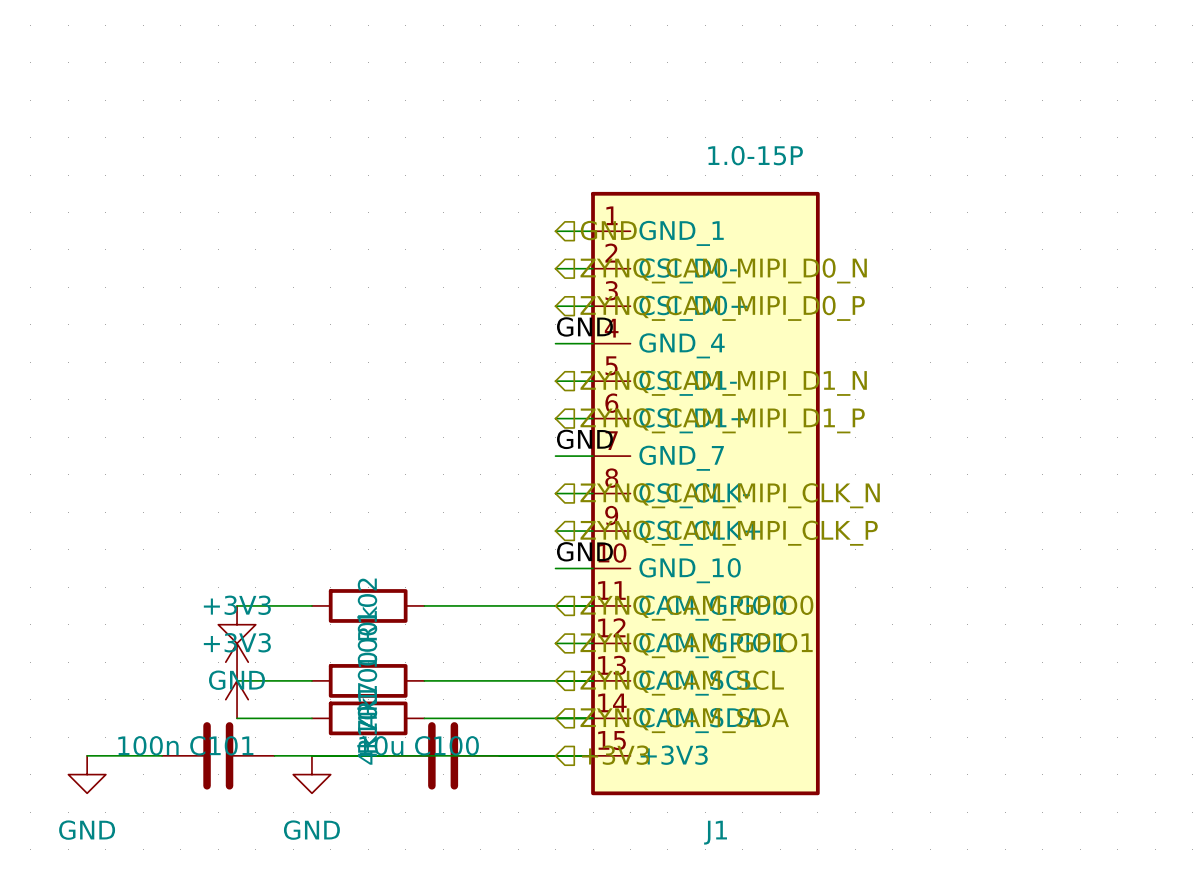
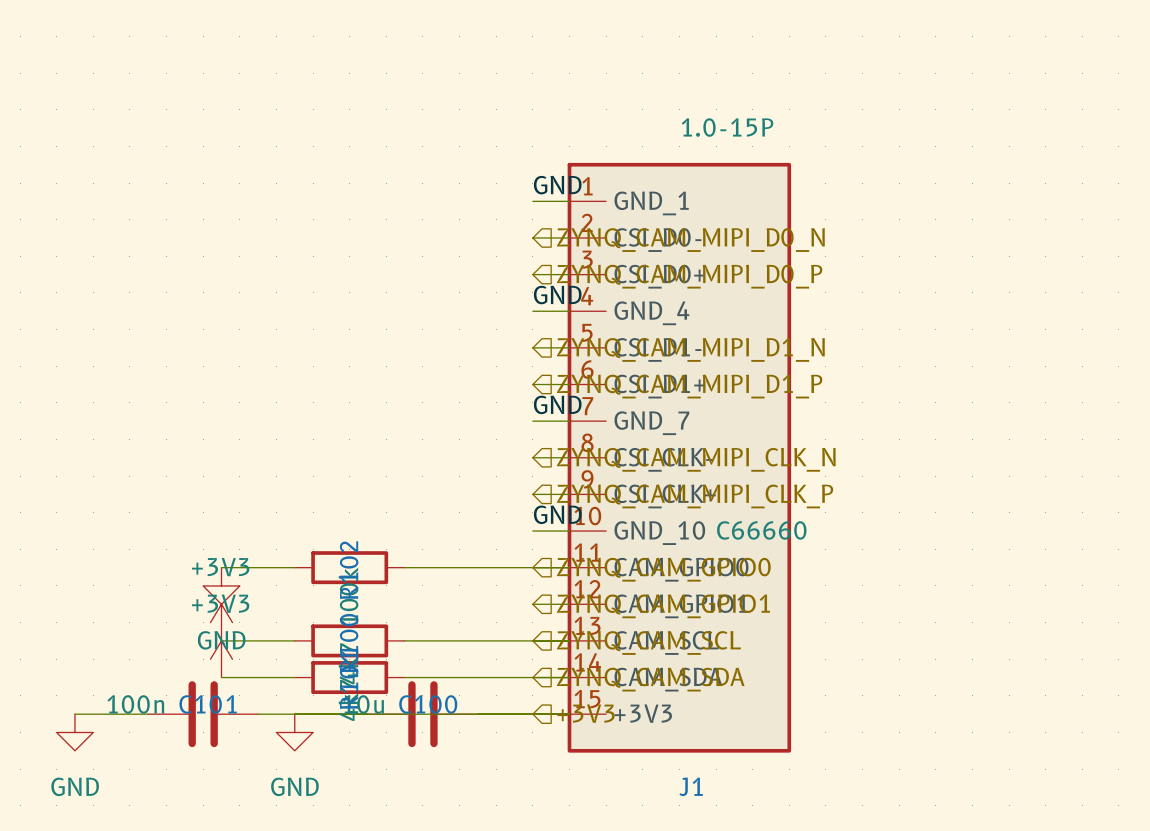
label: none -> GND (557, 185)
hierarchical label: GND (608, 230) -> none
J1 text: none -> C66660 (761, 530)

